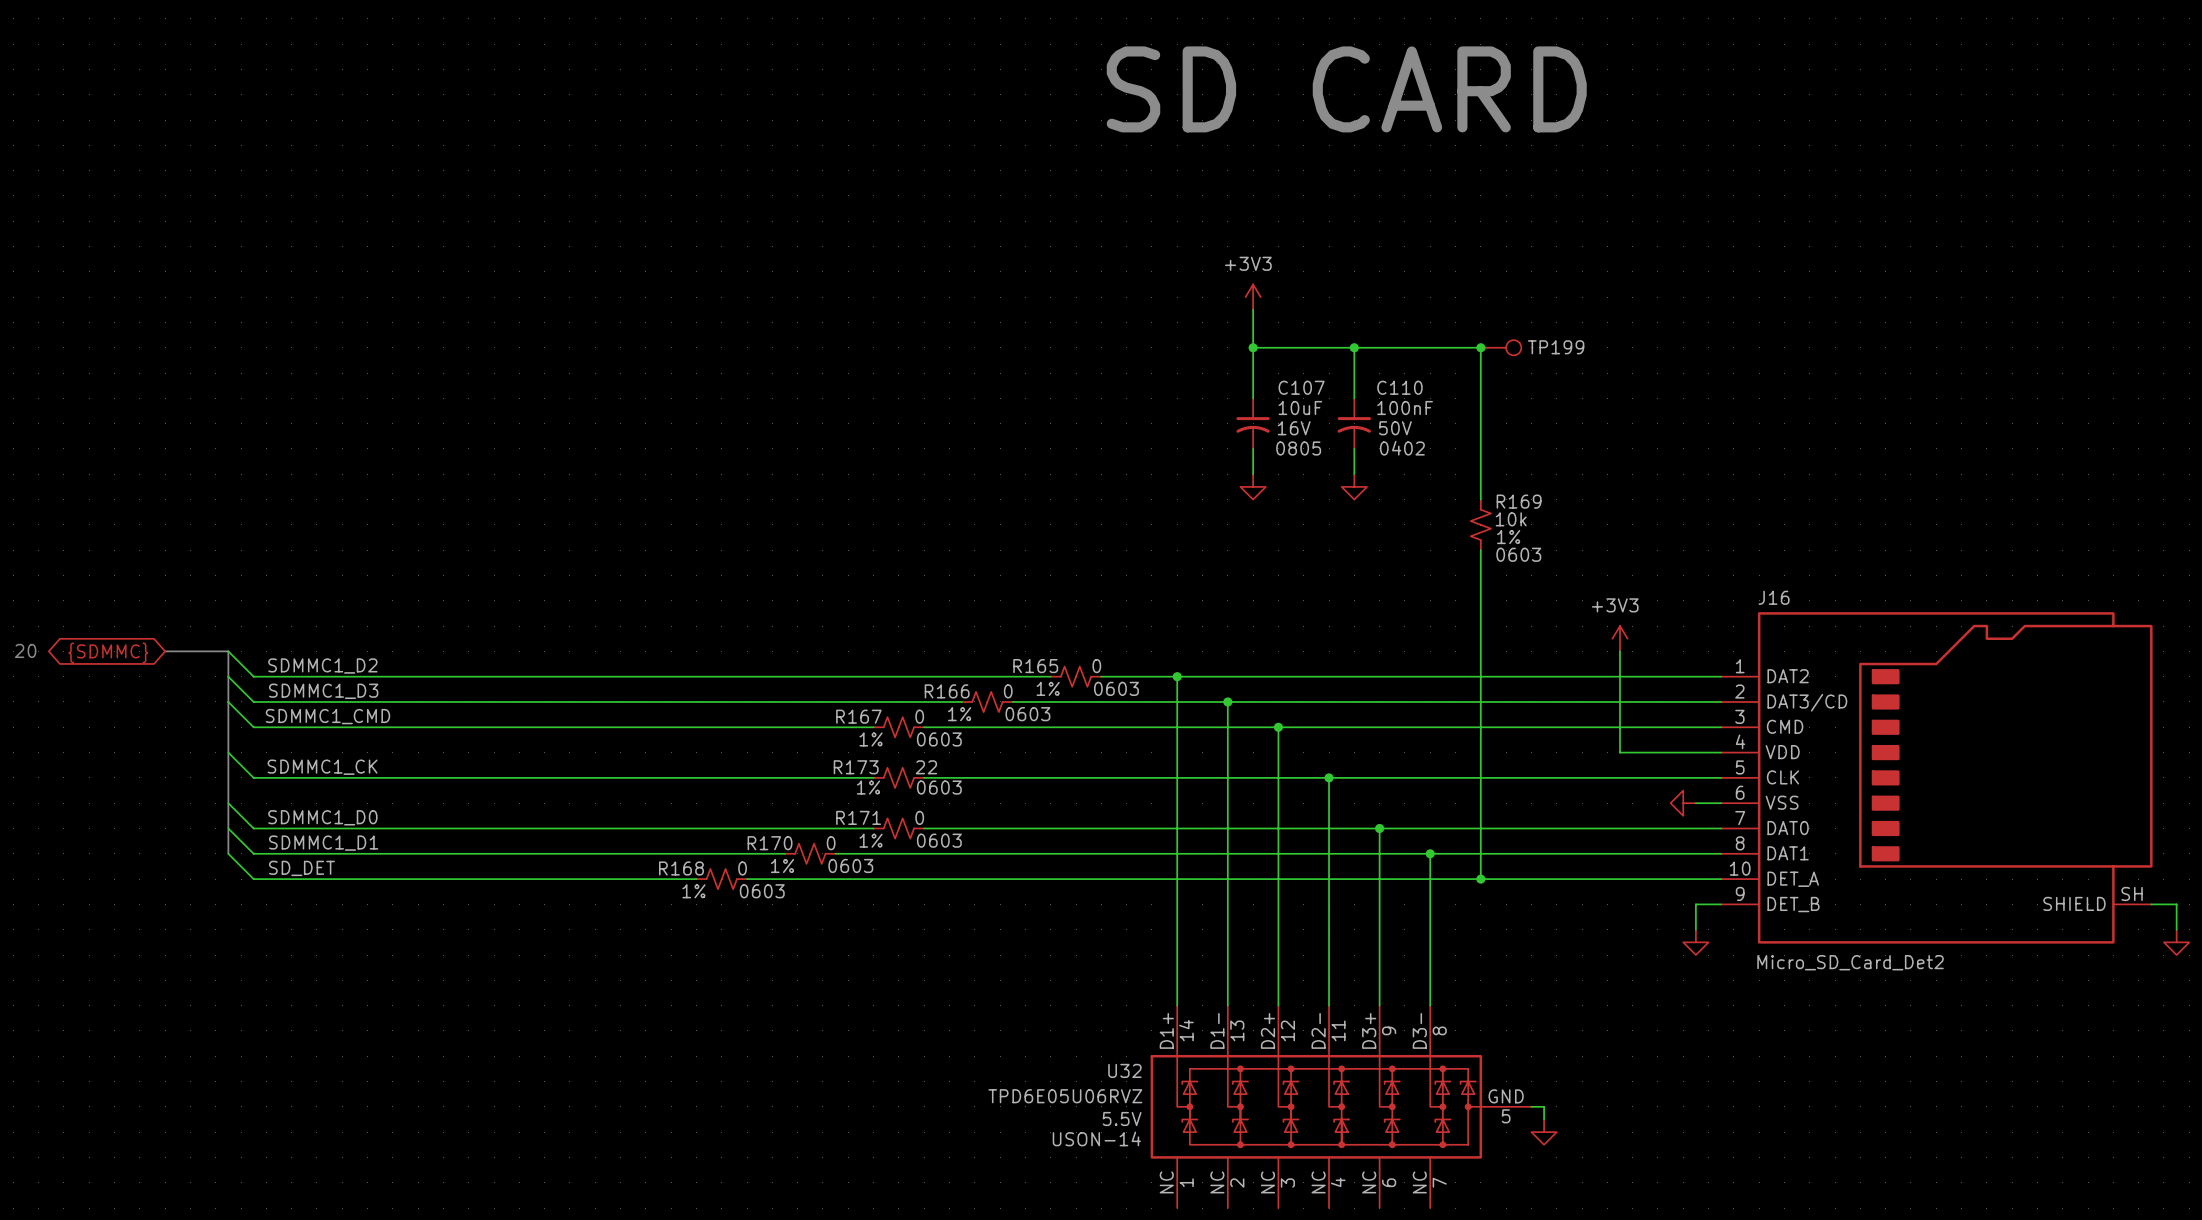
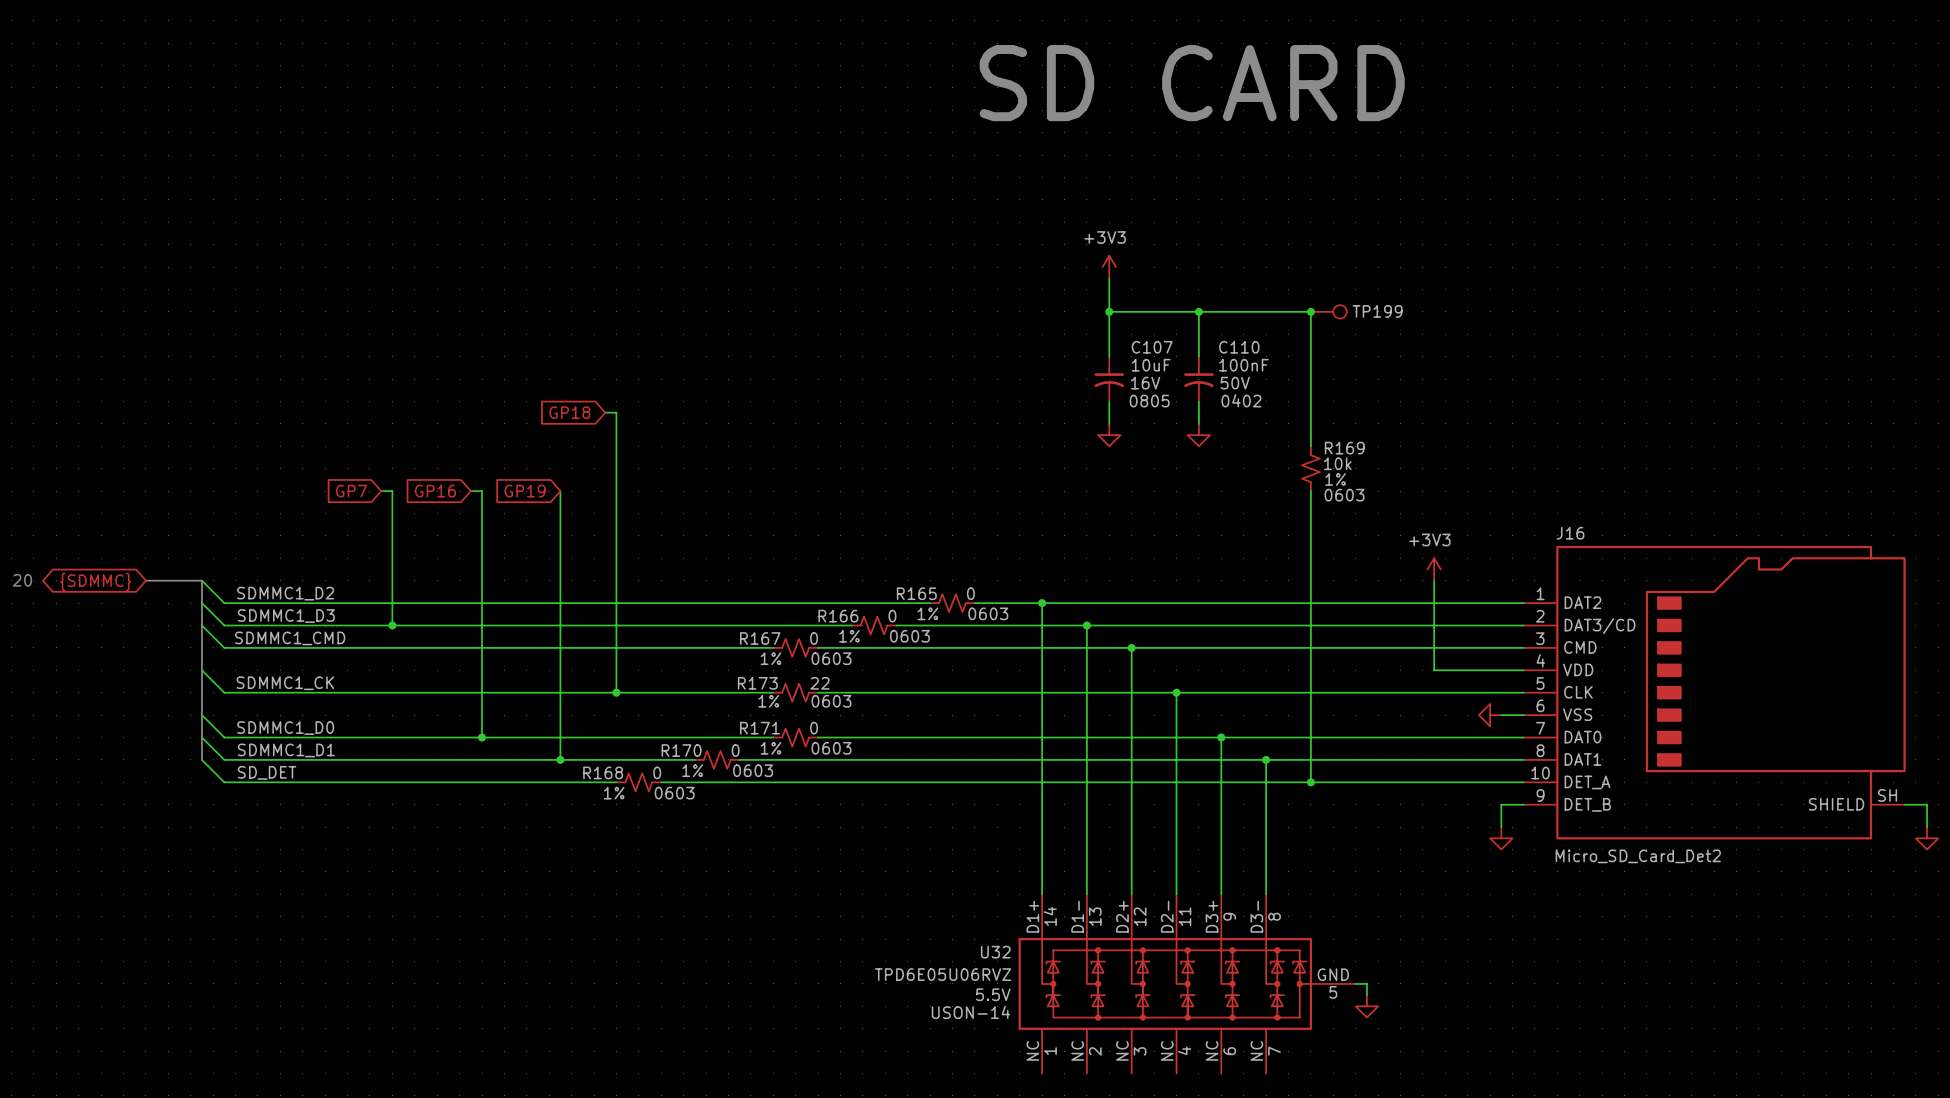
global label: none -> GP18 (569, 412)
wire: none -> (605, 412) (616, 412) (616, 692)
global label: none -> GP7 (351, 491)
wire: none -> (381, 491) (392, 491) (392, 625)
global label: none -> GP16 (435, 491)
wire: none -> (470, 491) (482, 491) (482, 737)
global label: none -> GP19 (525, 491)
wire: none -> (560, 491) (560, 759)
junction: none -> (392, 625)
junction: none -> (616, 692)
junction: none -> (482, 737)
junction: none -> (560, 759)

